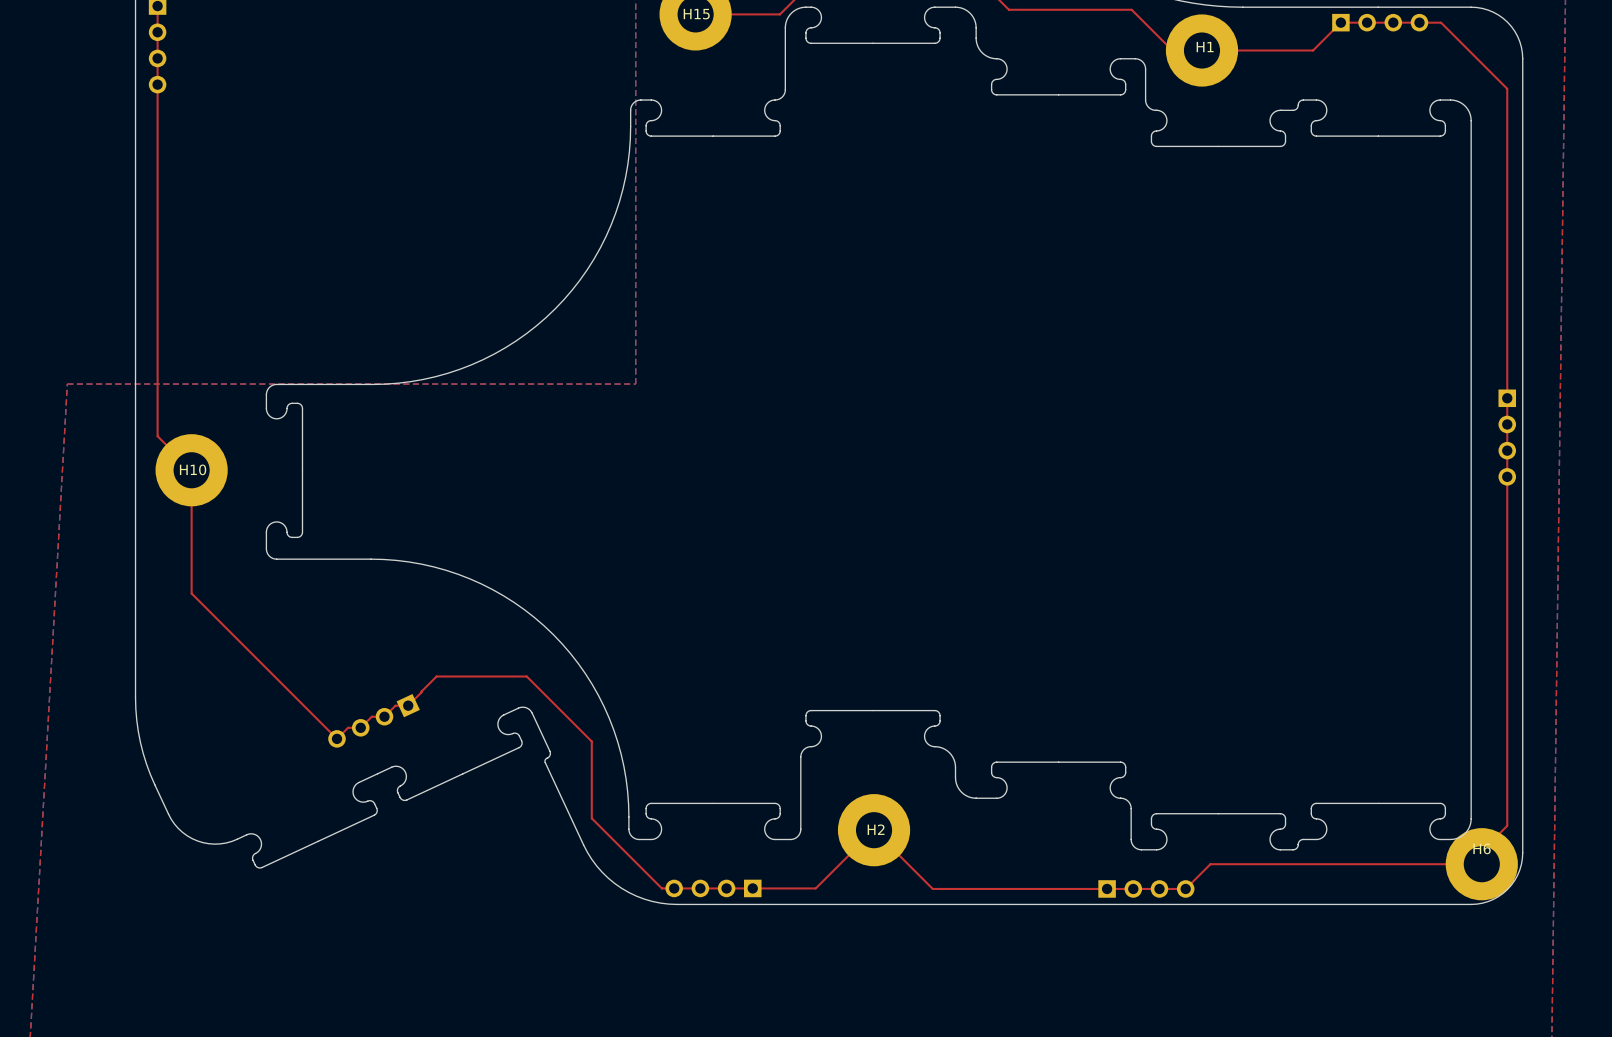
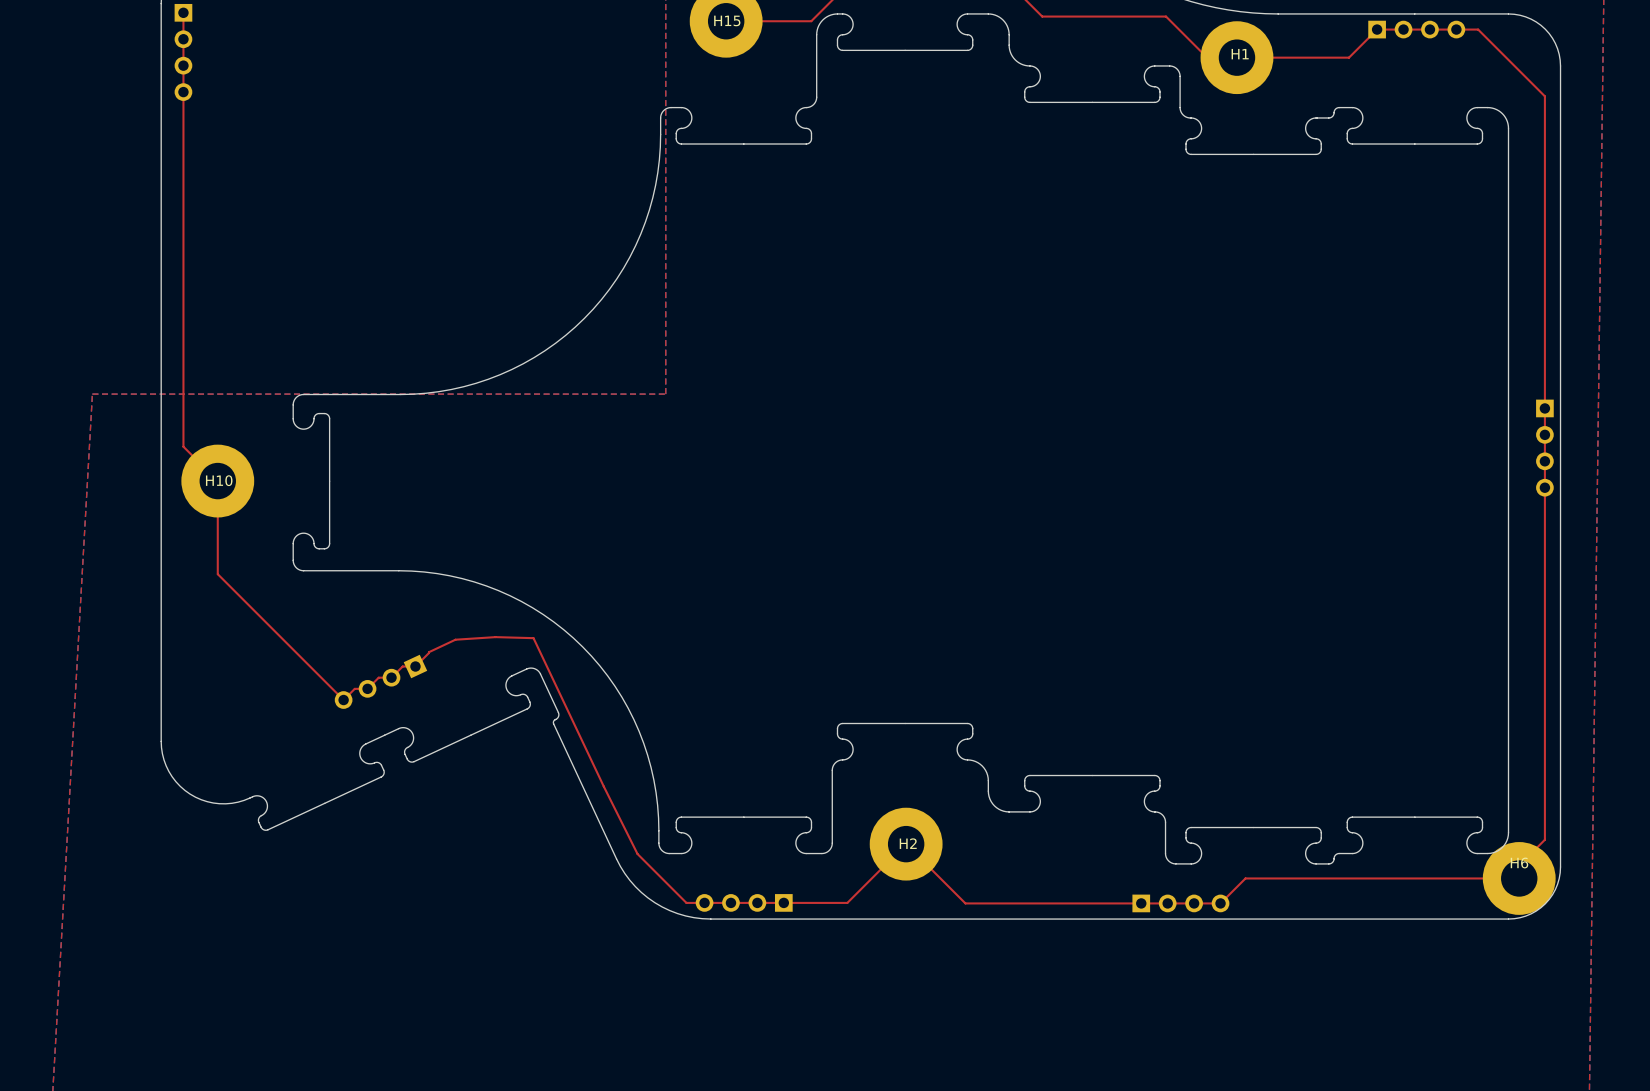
top track: (191, 562) (191, 593) (337, 738) (348, 727) (360, 727) (371, 716) (384, 716) (395, 705) (408, 705) (436, 676) (526, 676) (591, 741) (591, 818) (661, 888) -> (217, 574) (343, 700) (354, 688) (367, 688) (378, 677) (391, 677) (402, 666) (415, 666) (428, 652) (455, 639) (495, 637) (533, 638) (637, 854) (686, 902) (692, 902)
board edge: (135, 697) (136, 720) (143, 753) (154, 784) (174, 824) (192, 838) (208, 843) (226, 842) (248, 834) (255, 834) (260, 839) (261, 845) (252, 858) (255, 866) (259, 867) (375, 814) (377, 809) (373, 802) (358, 800) (354, 796) (353, 788) (357, 783) (391, 767) (400, 767) (405, 772) (405, 780) (397, 790) (400, 798) (405, 800) (519, 747) (522, 742) (518, 735) (502, 732) (498, 728) (498, 722) (503, 714) (519, 707) (526, 707) (532, 713) (550, 751) (545, 762) (583, 844) (596, 866) (614, 883) (636, 896) (660, 903) (680, 904) -> (161, 710) (162, 753) (166, 765) (175, 781) (195, 797) (213, 803) (232, 803) (255, 795) (261, 796) (265, 800) (267, 807) (258, 820) (261, 828) (266, 830) (382, 776) (384, 771) (380, 764) (364, 762) (360, 757) (360, 750) (364, 744) (398, 728) (407, 728) (412, 733) (412, 742) (404, 752) (408, 760) (412, 762) (527, 708) (530, 703) (527, 696) (510, 693) (506, 688) (506, 683) (511, 675) (527, 668) (534, 668) (540, 674) (558, 713) (553, 723) (624, 873) (641, 892) (662, 906) (685, 915) (710, 919)
part position: (374, 720) -> (381, 681)

